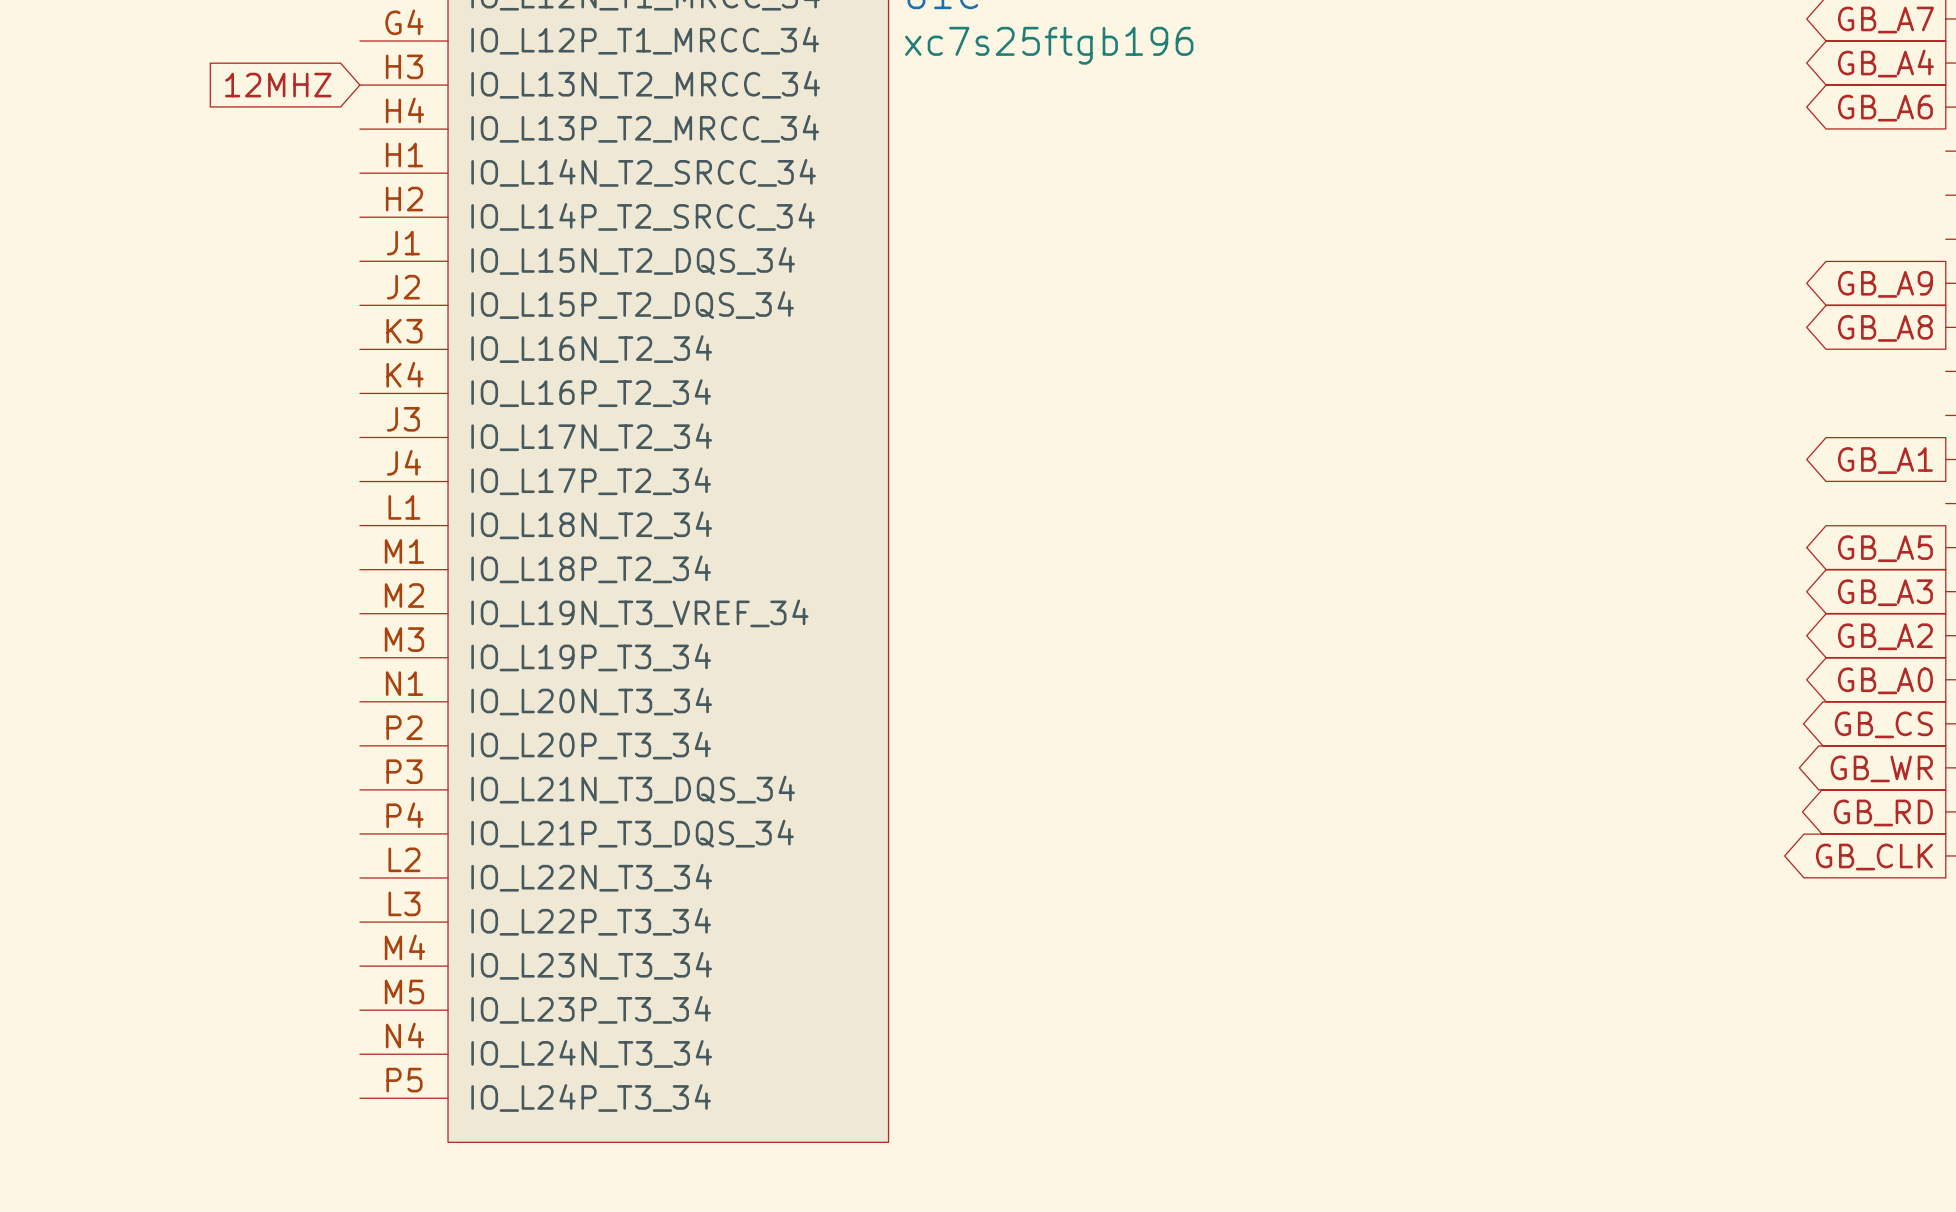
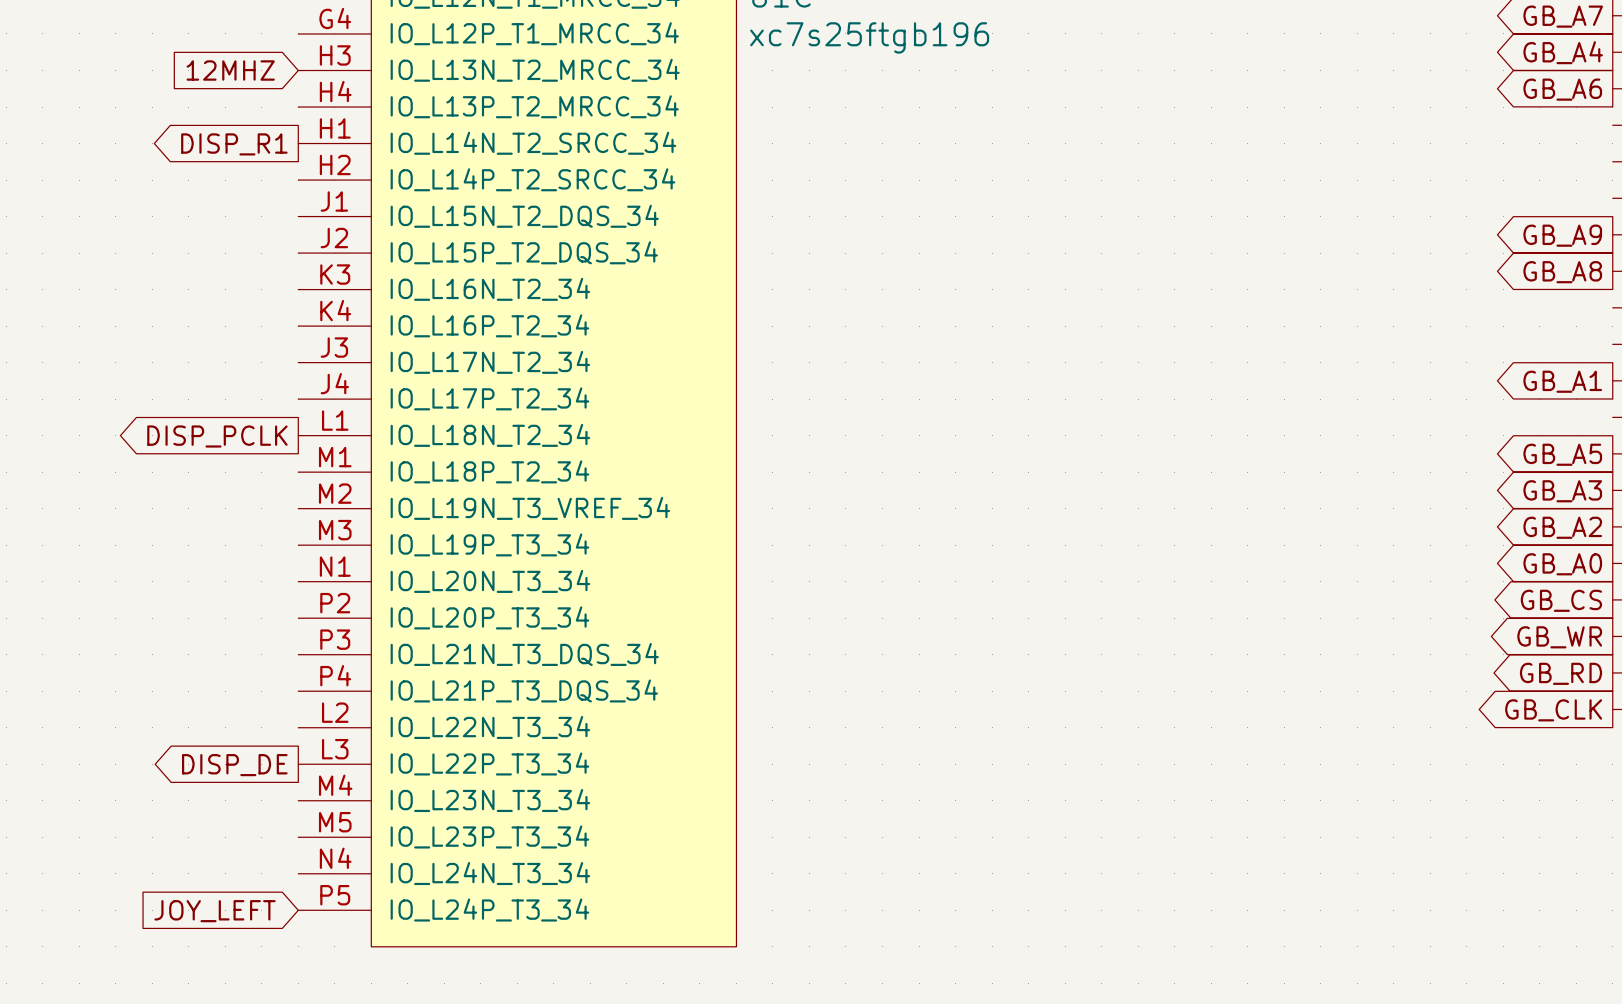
global label: none -> DISP_R1 (234, 144)
global label: none -> DISP_PCLK (217, 436)
global label: none -> DISP_DE (234, 765)
global label: none -> JOY_LEFT (215, 911)

